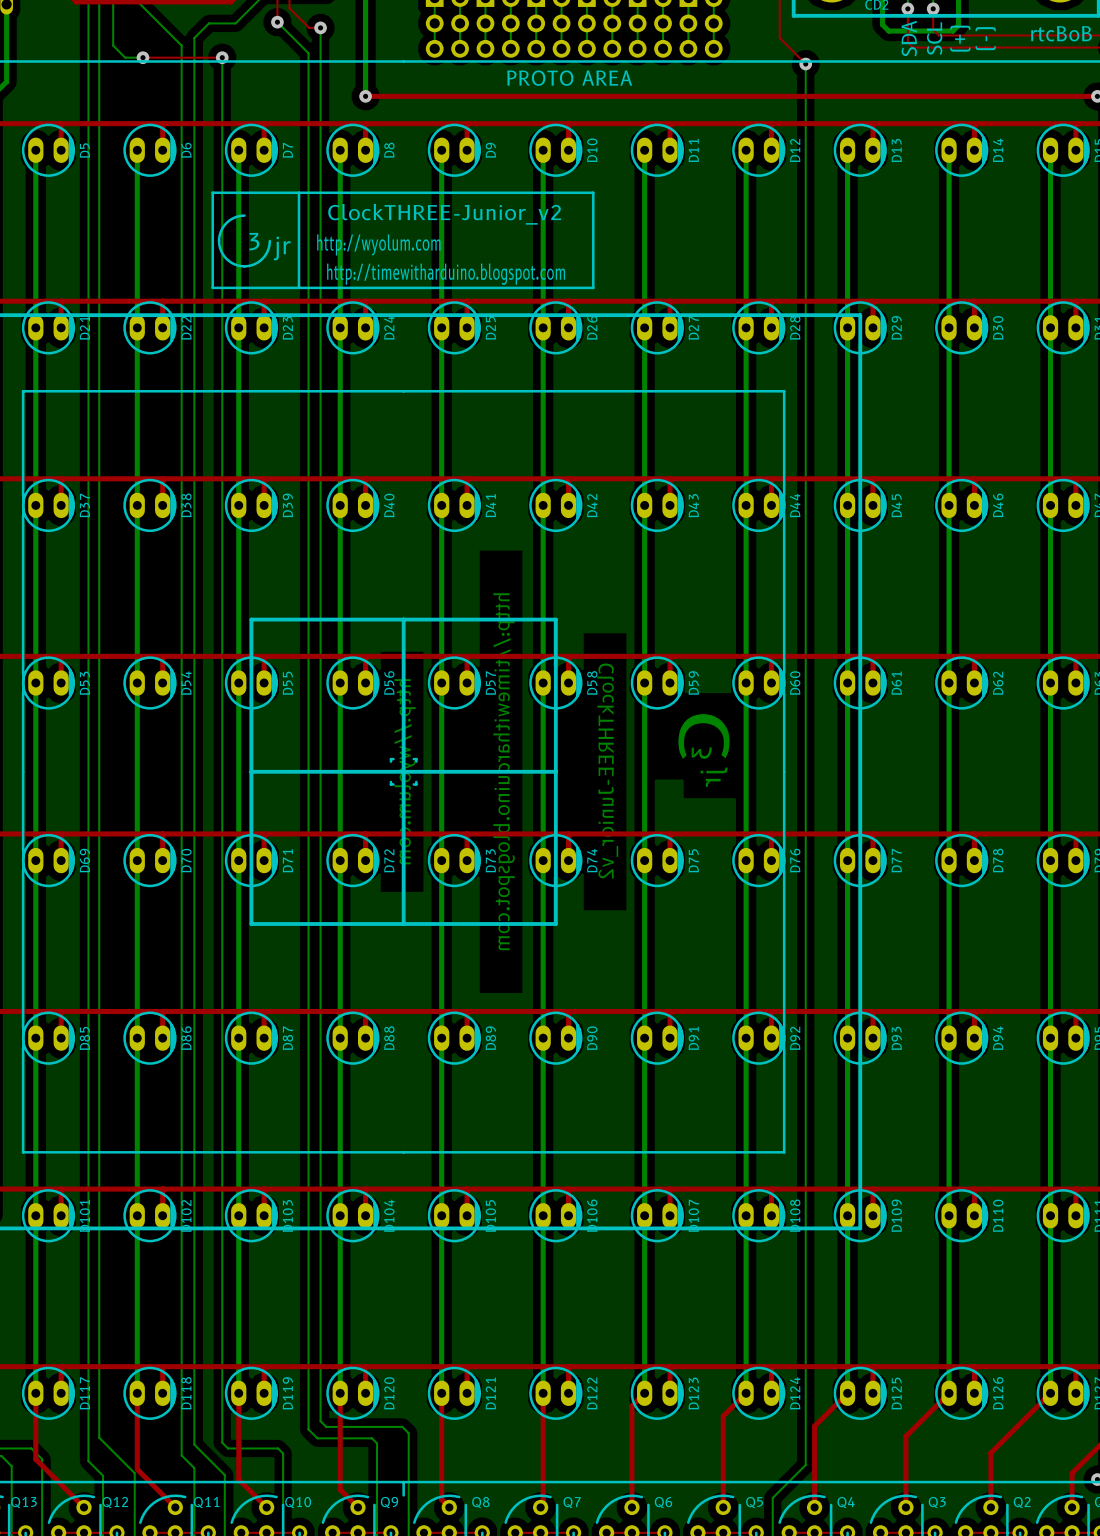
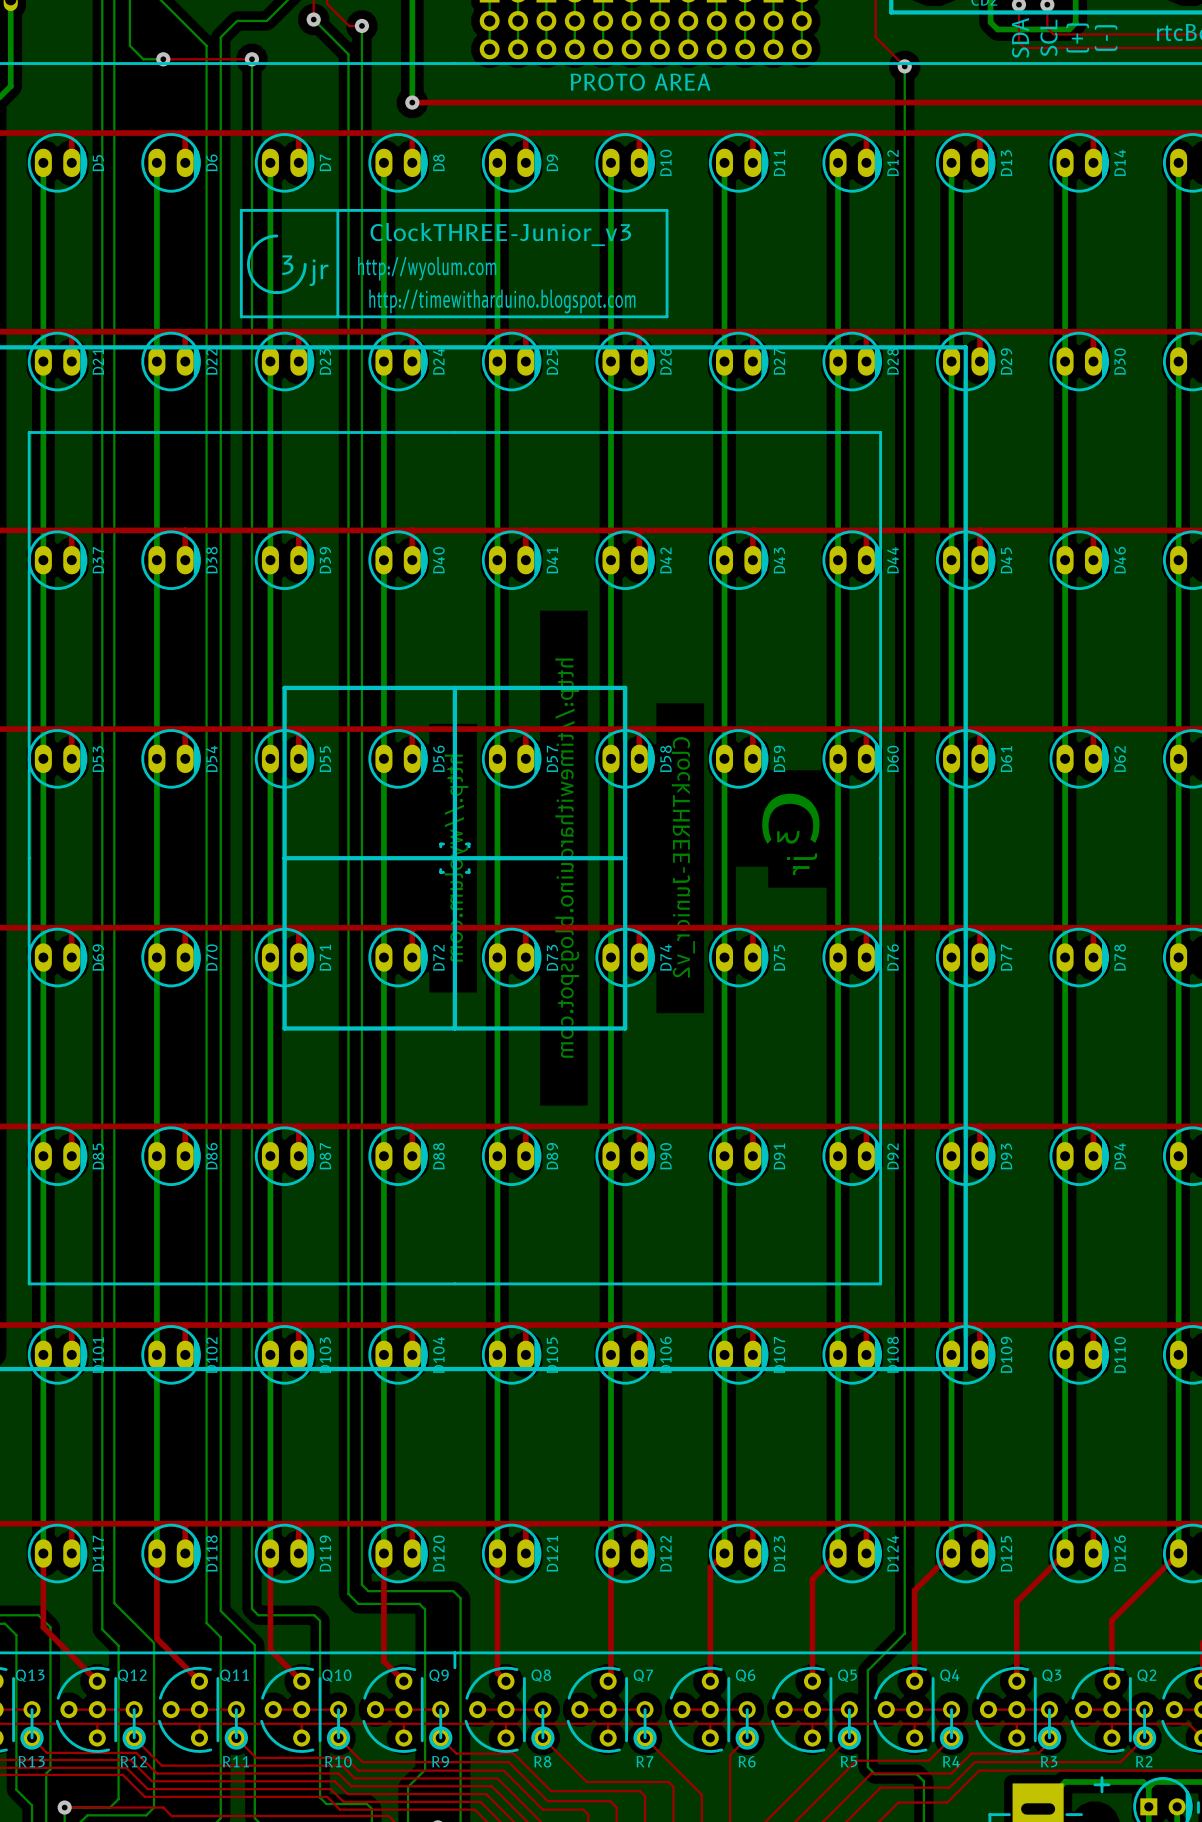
text: ClockTHREE-Junior_v2 (444, 214) -> ClockTHREE-Junior_v3 (500, 234)

